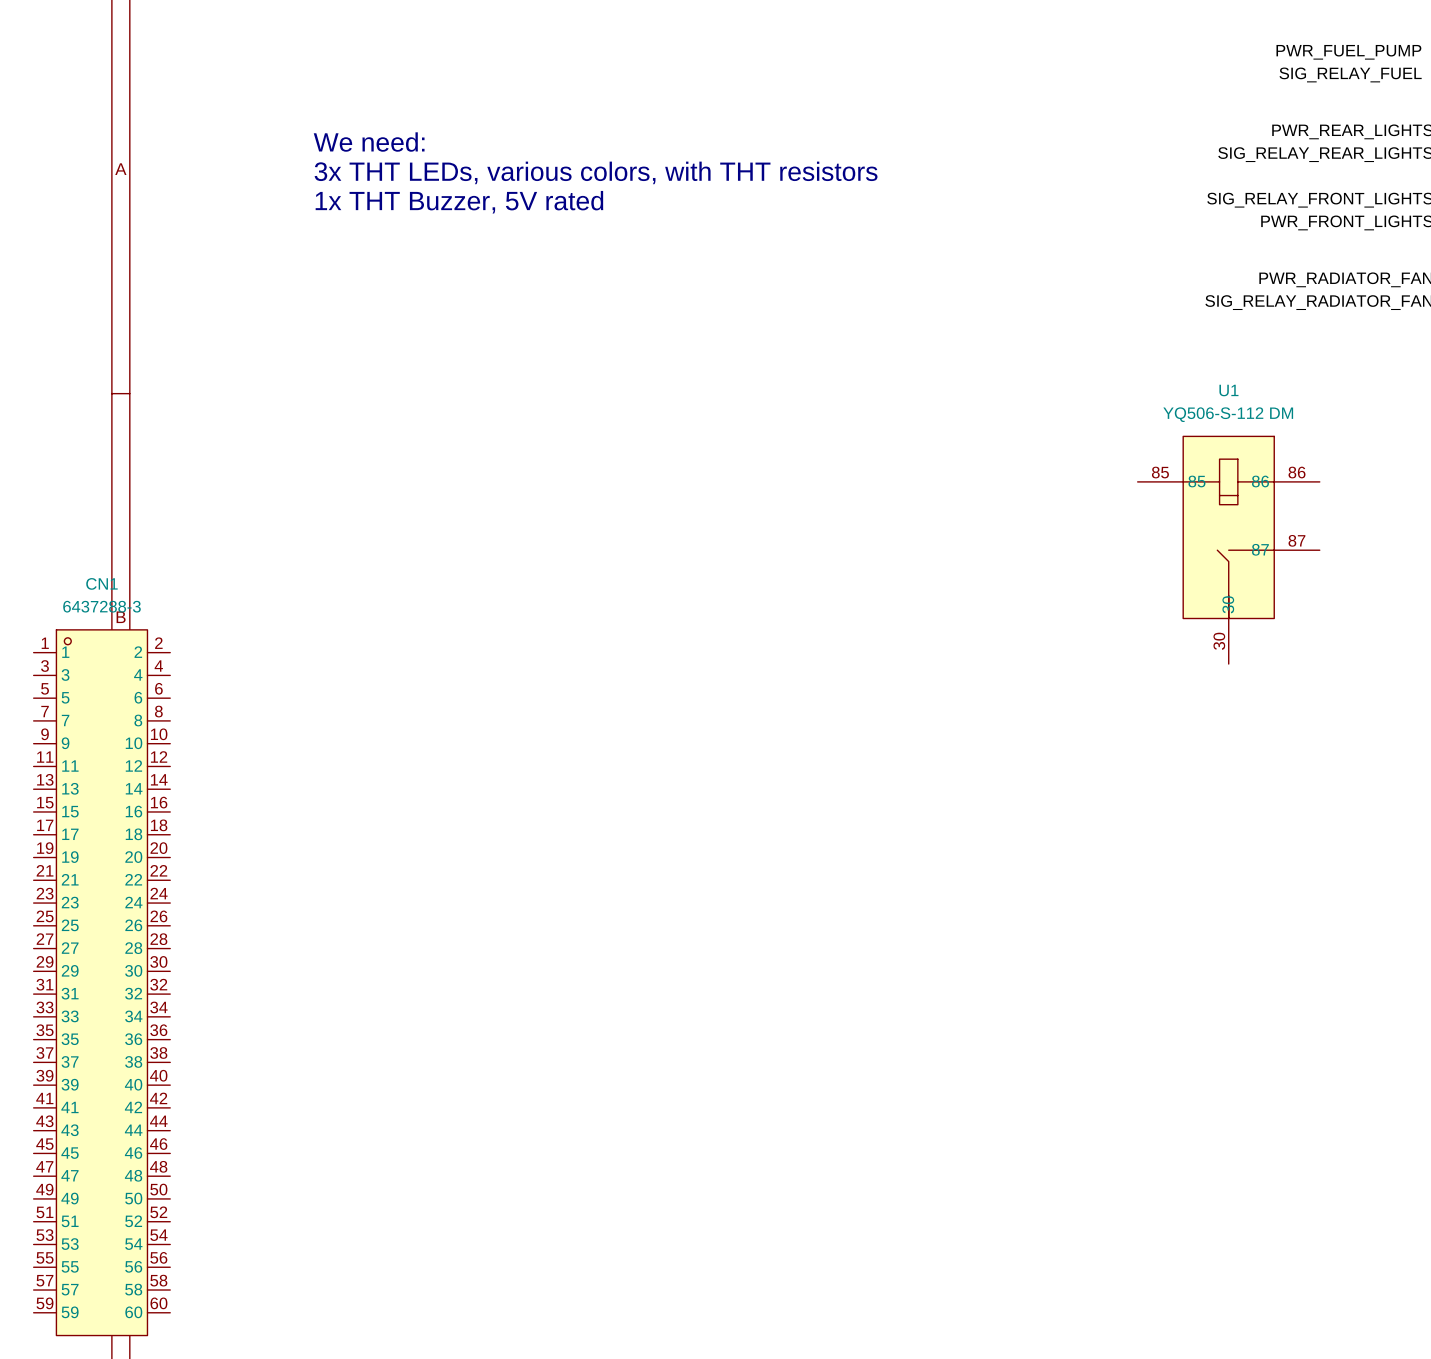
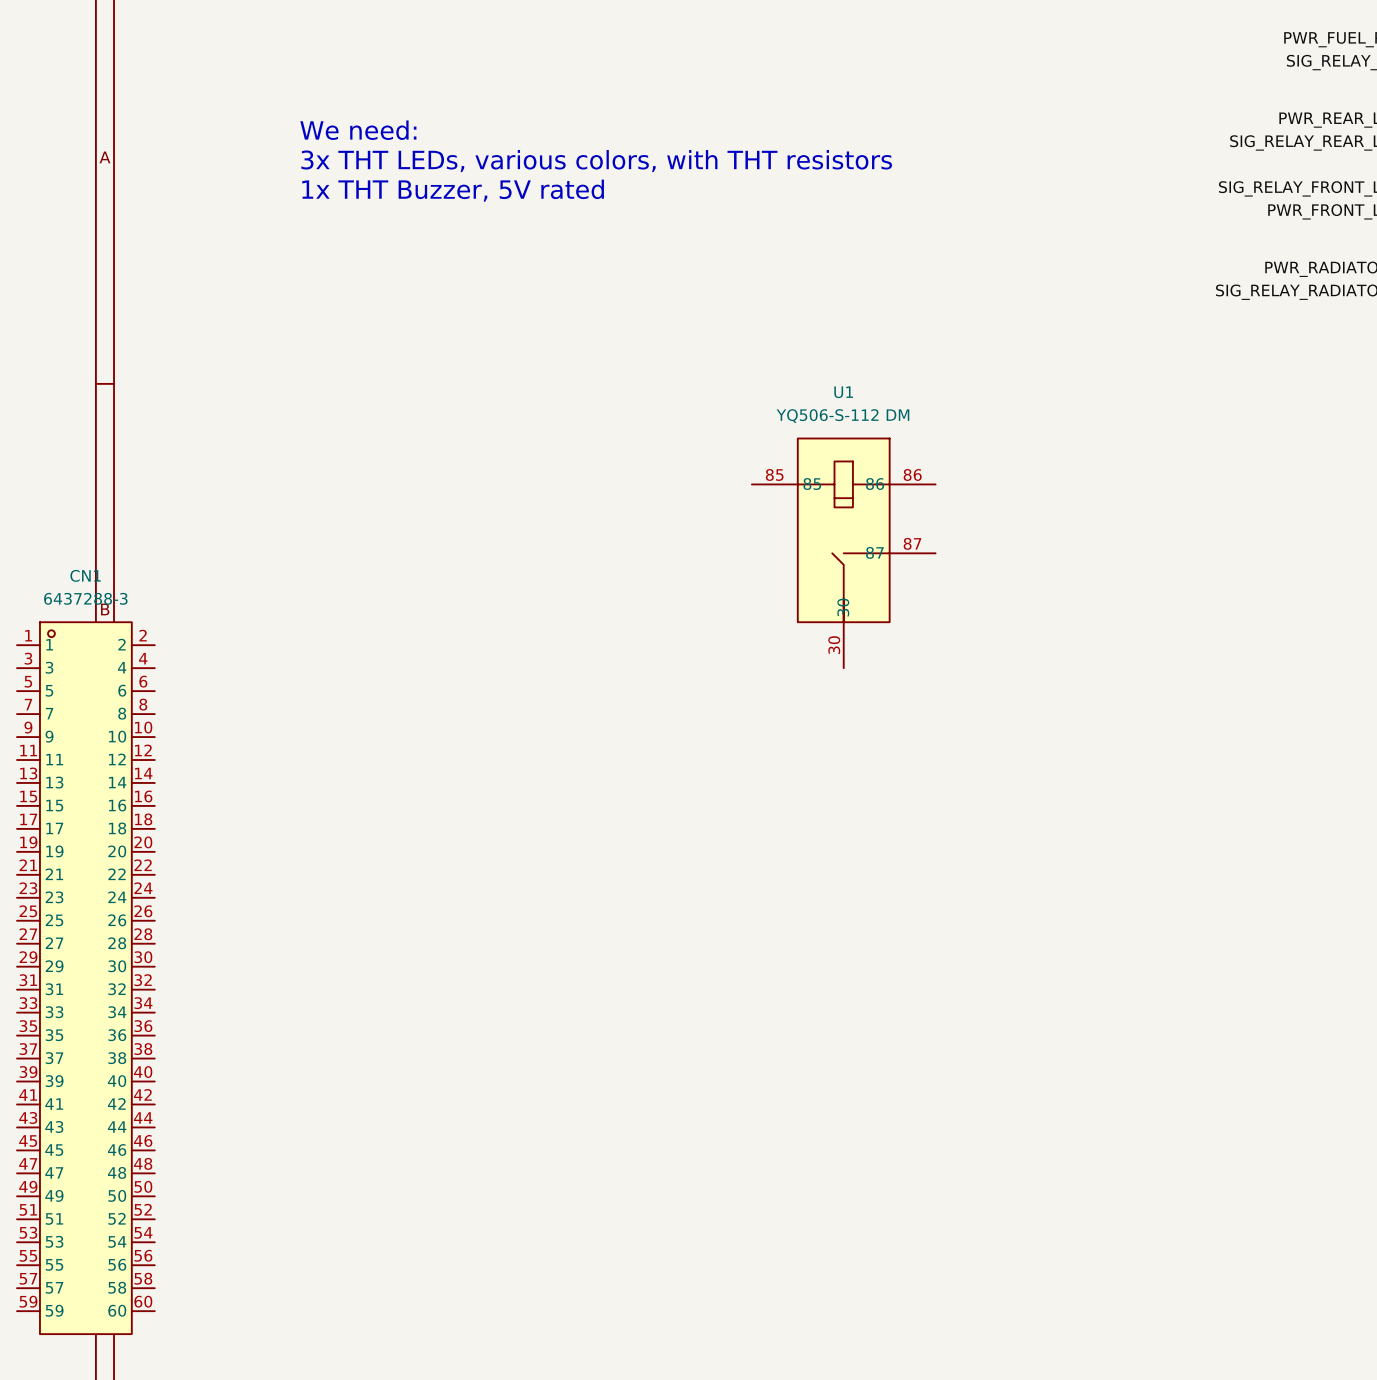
U1 position: (1228, 550) -> (843, 553)

